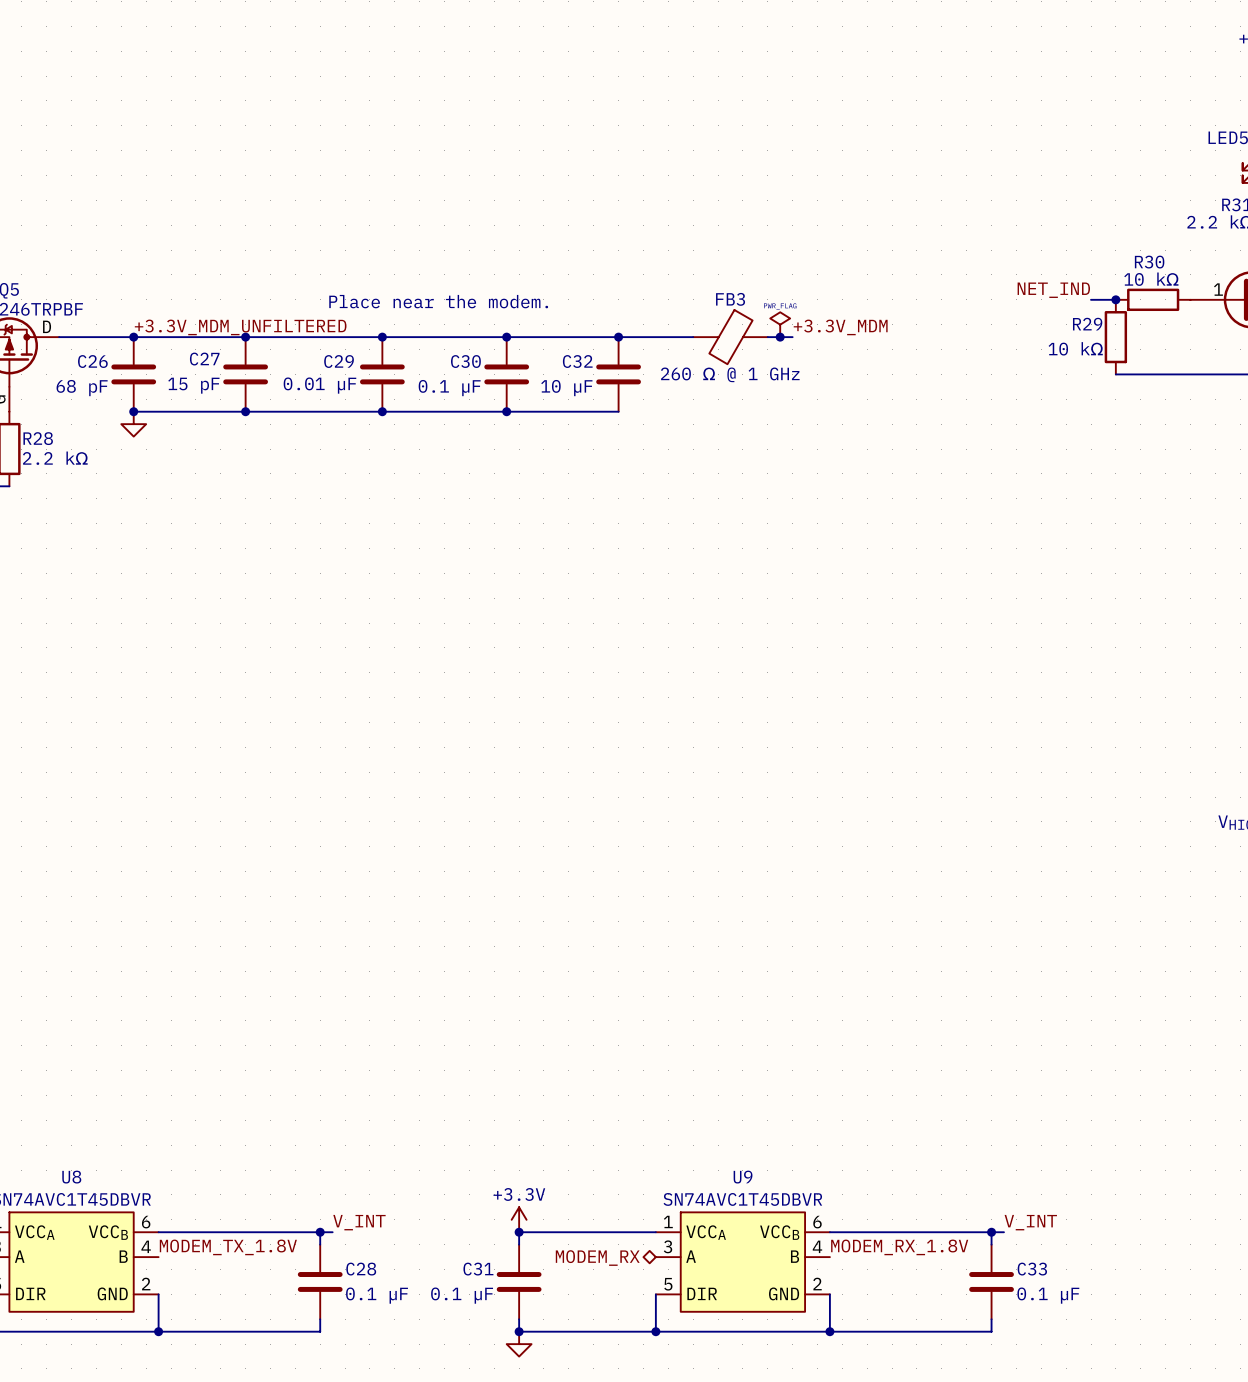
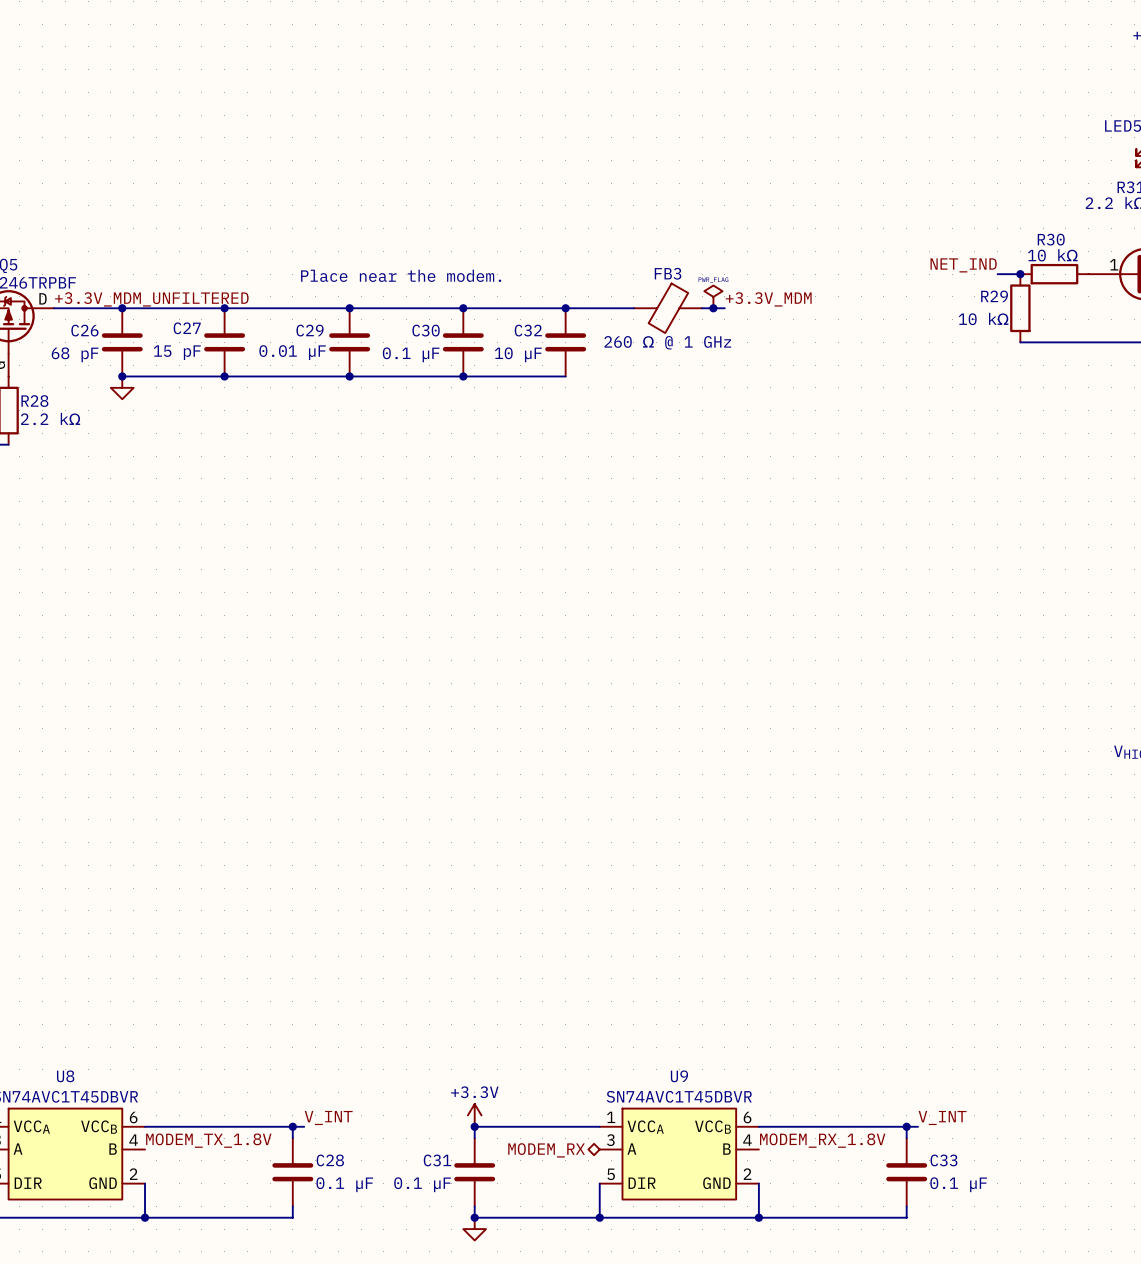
label position: +3.3V_MDM_UNFILTERED (240, 327) -> +3.3V_MDM_UNFILTERED (151, 299)

